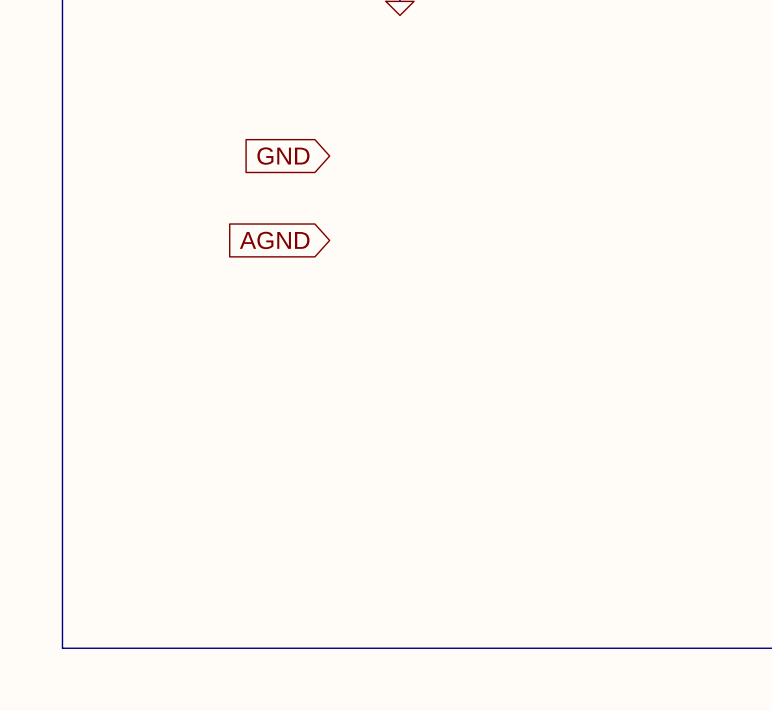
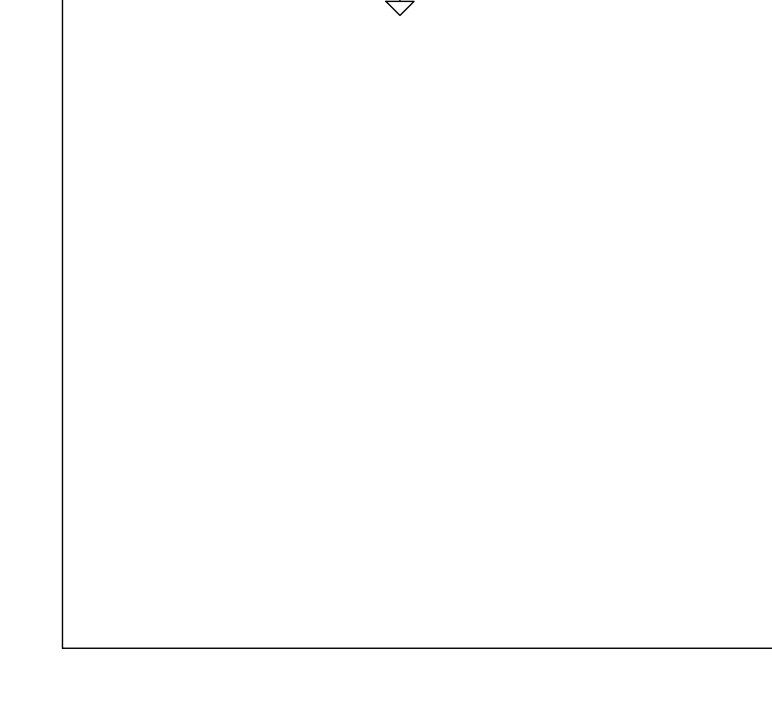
global label: GND (283, 156) -> none
global label: AGND (274, 240) -> none

